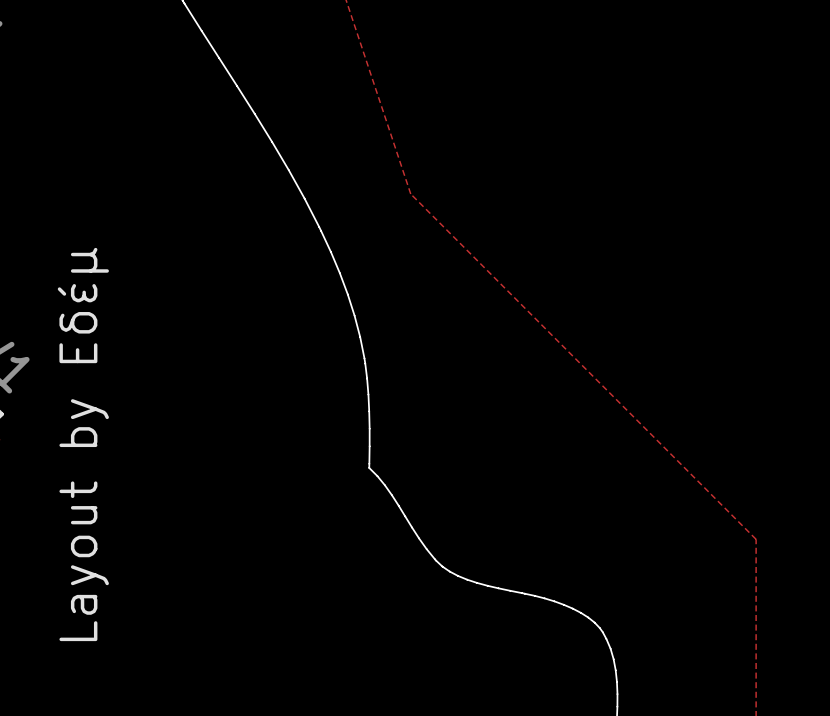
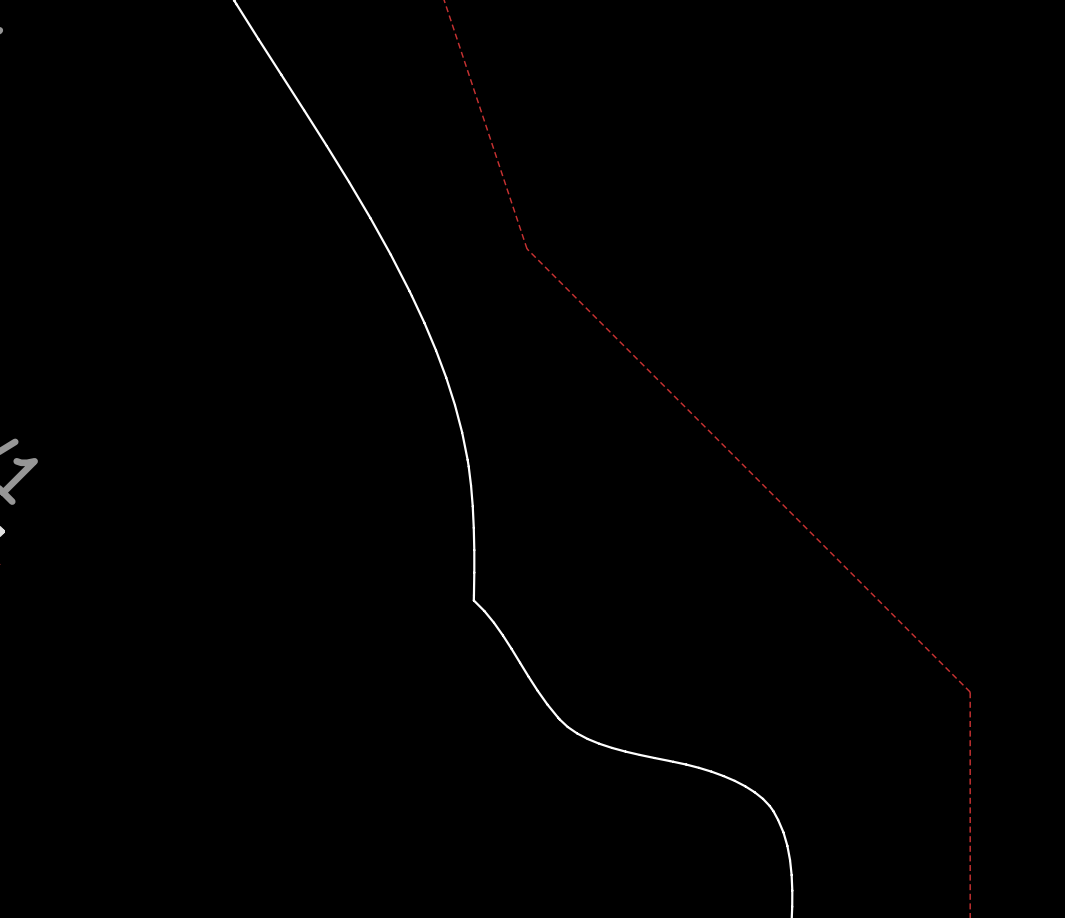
text: Layout by Εδέμ (83, 444) -> none

